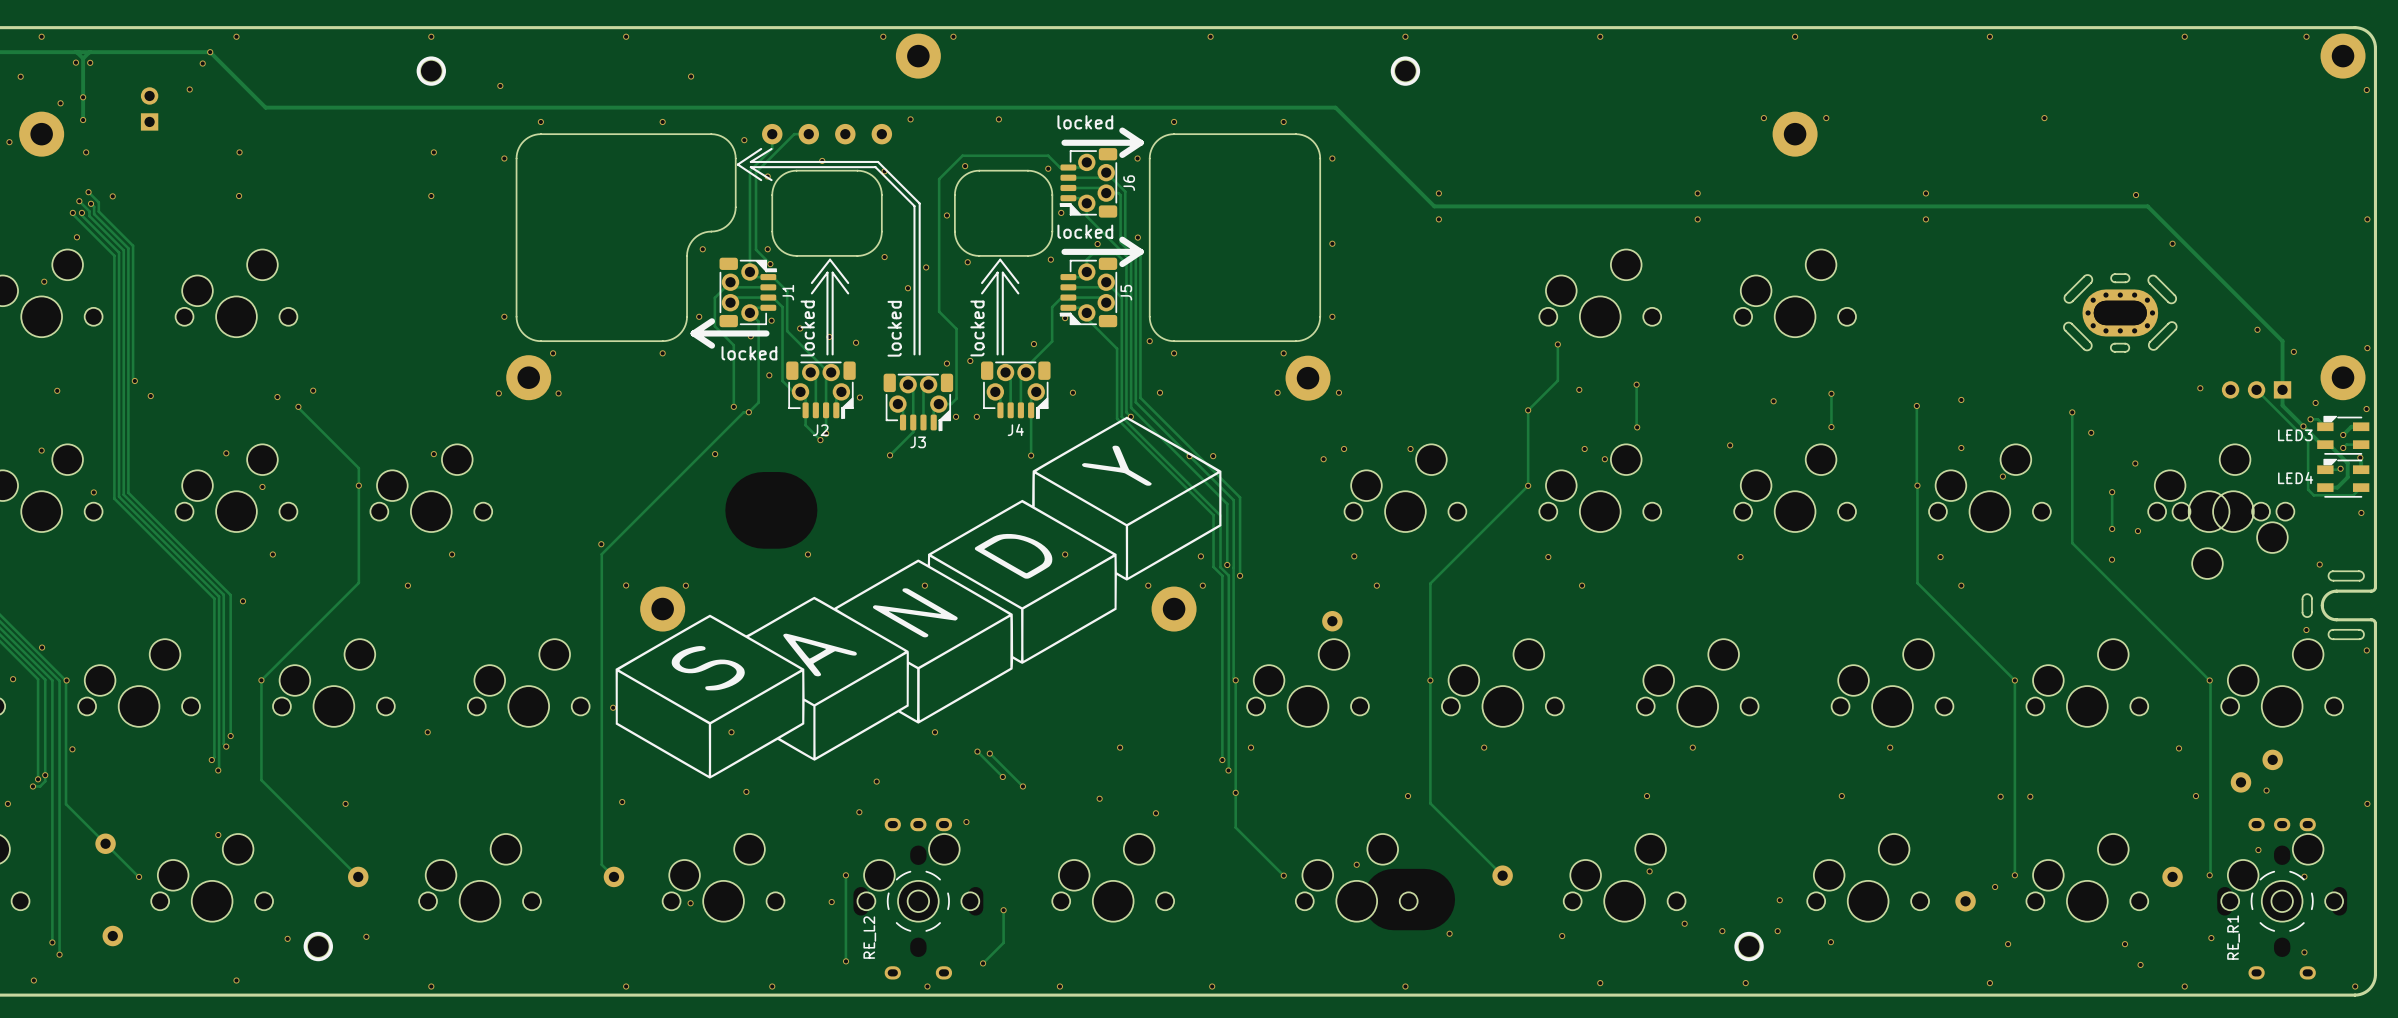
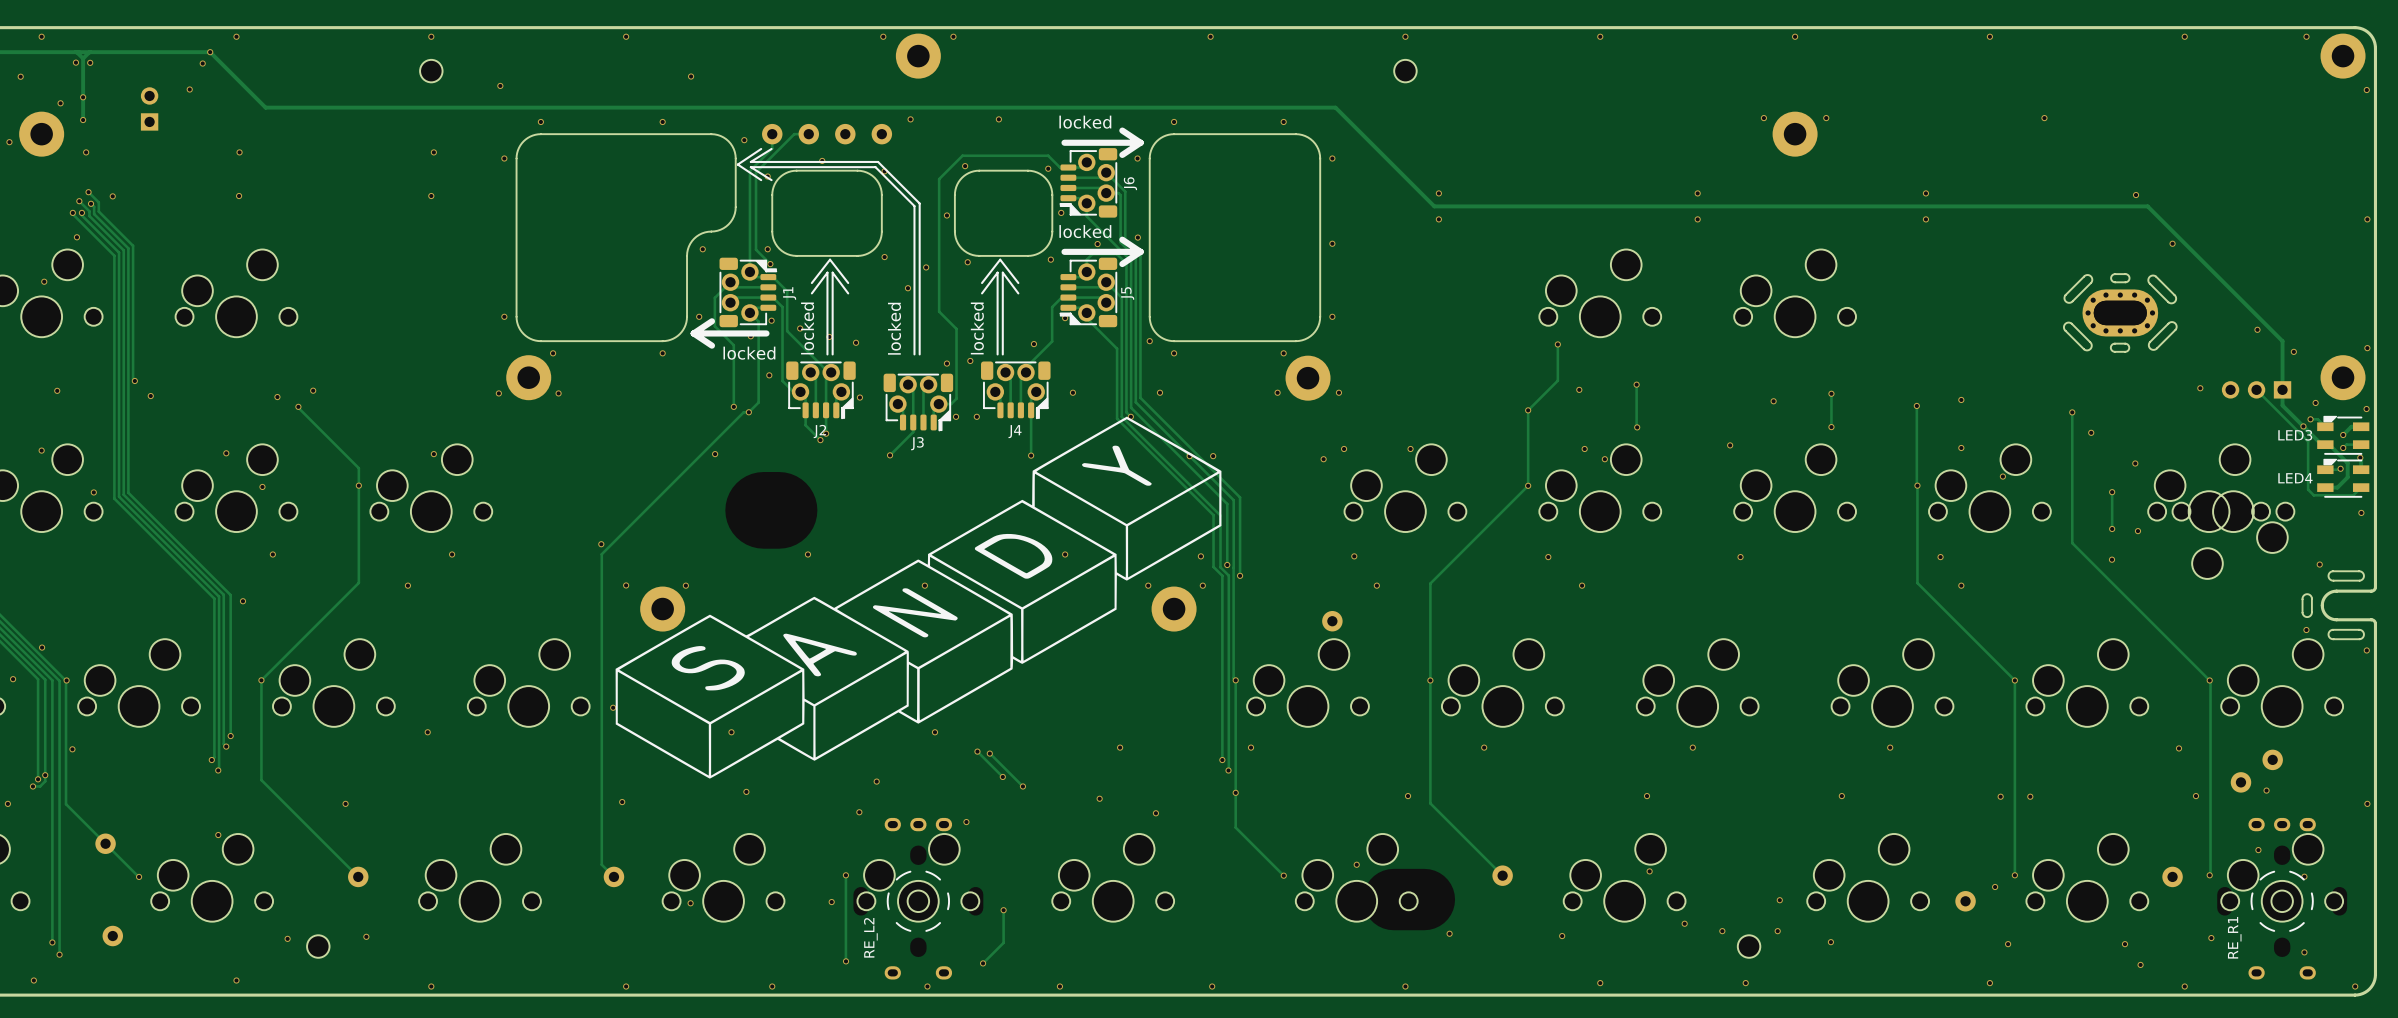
part side: top (431, 71) -> bottom (431, 71)
part side: top (1405, 71) -> bottom (1405, 71)
part side: top (318, 946) -> bottom (318, 946)
part side: top (1749, 946) -> bottom (1749, 946)

